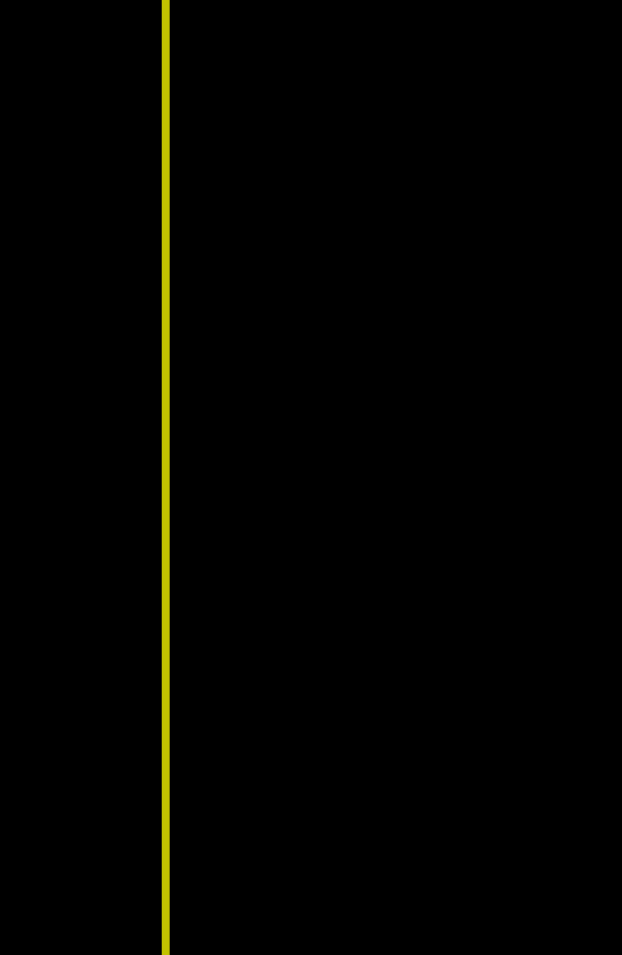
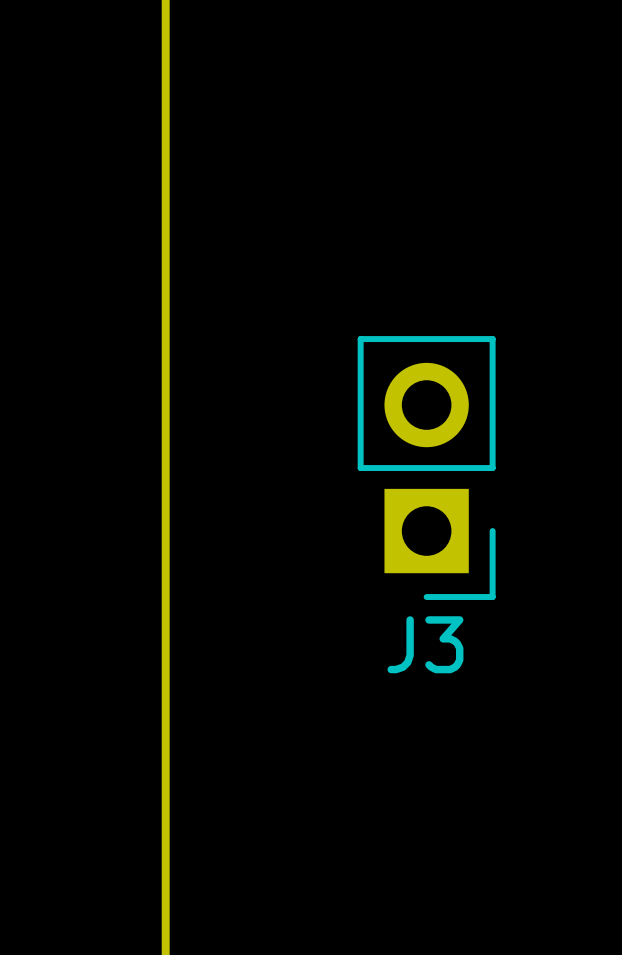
J3: none -> (426, 468)

